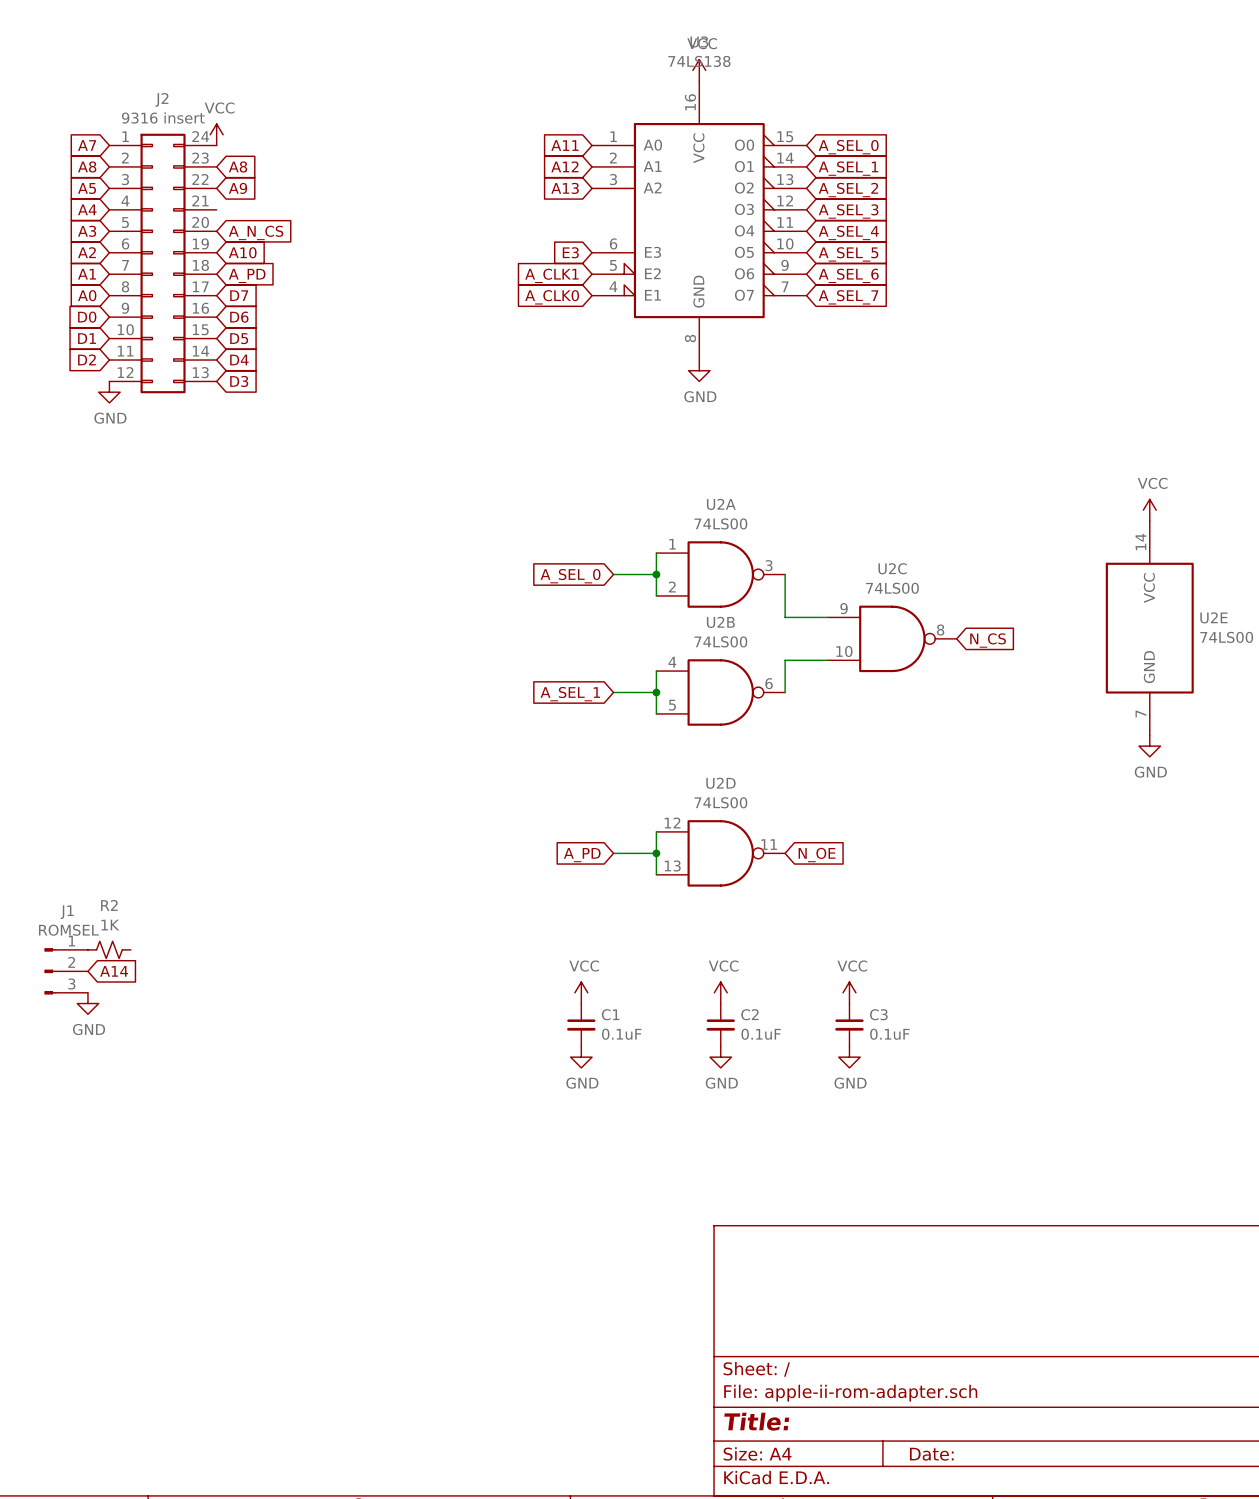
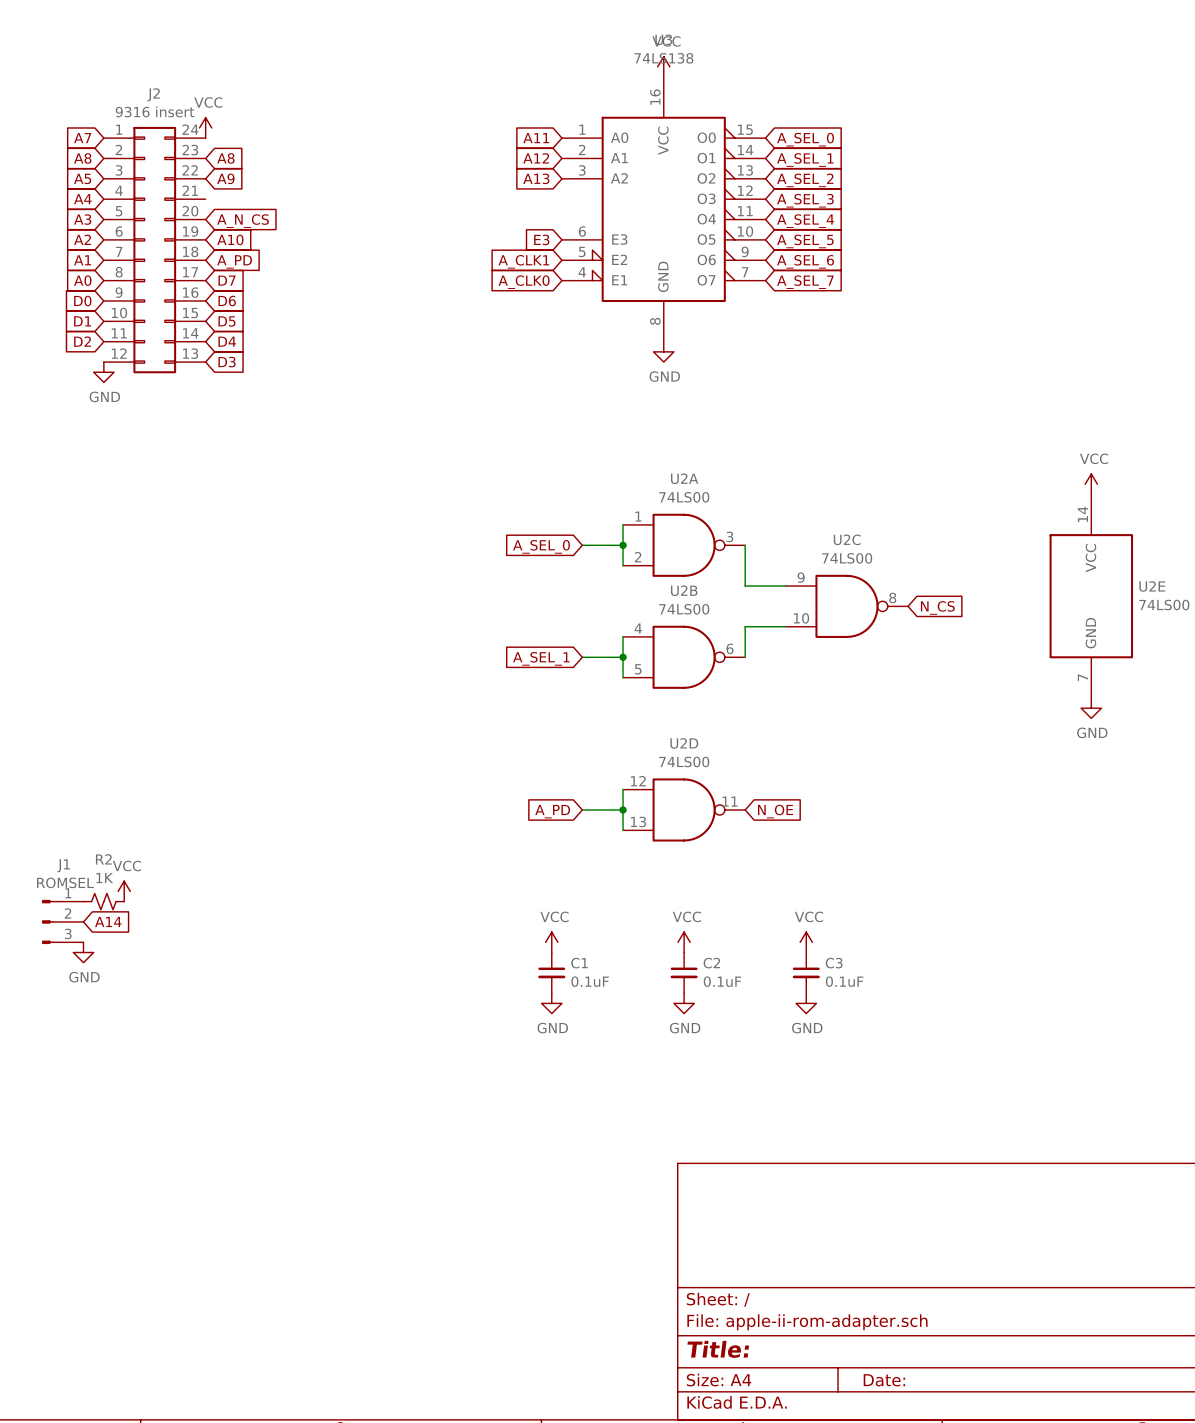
power symbol: none -> VCC (124, 891)

